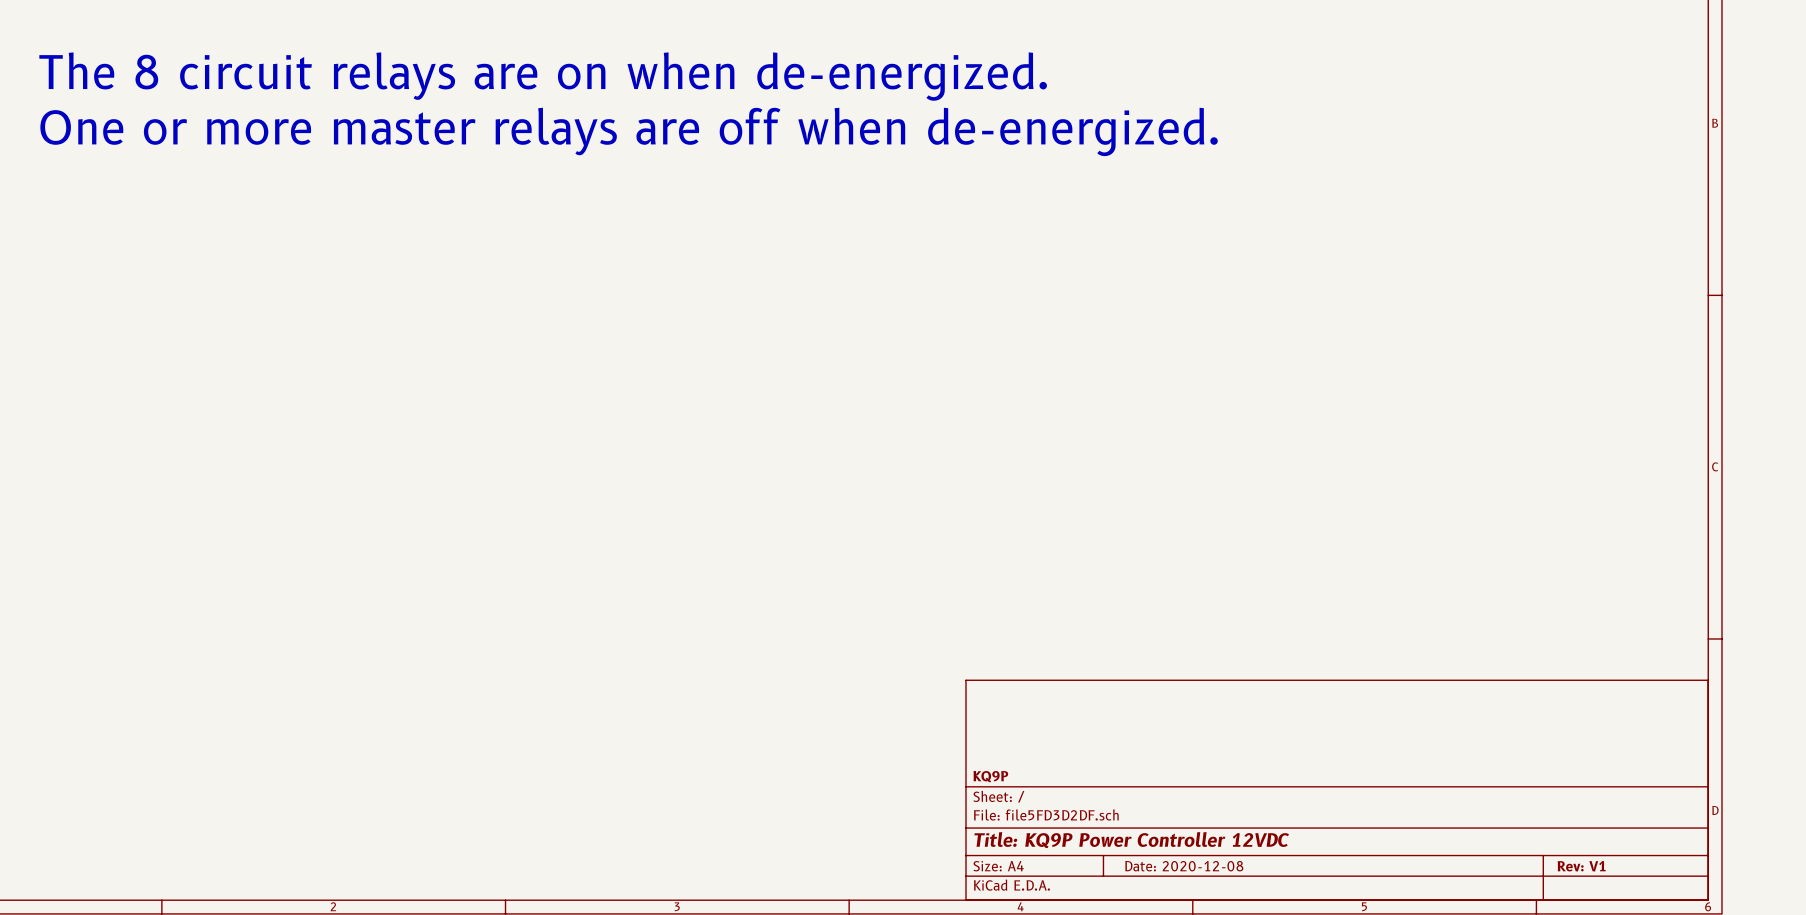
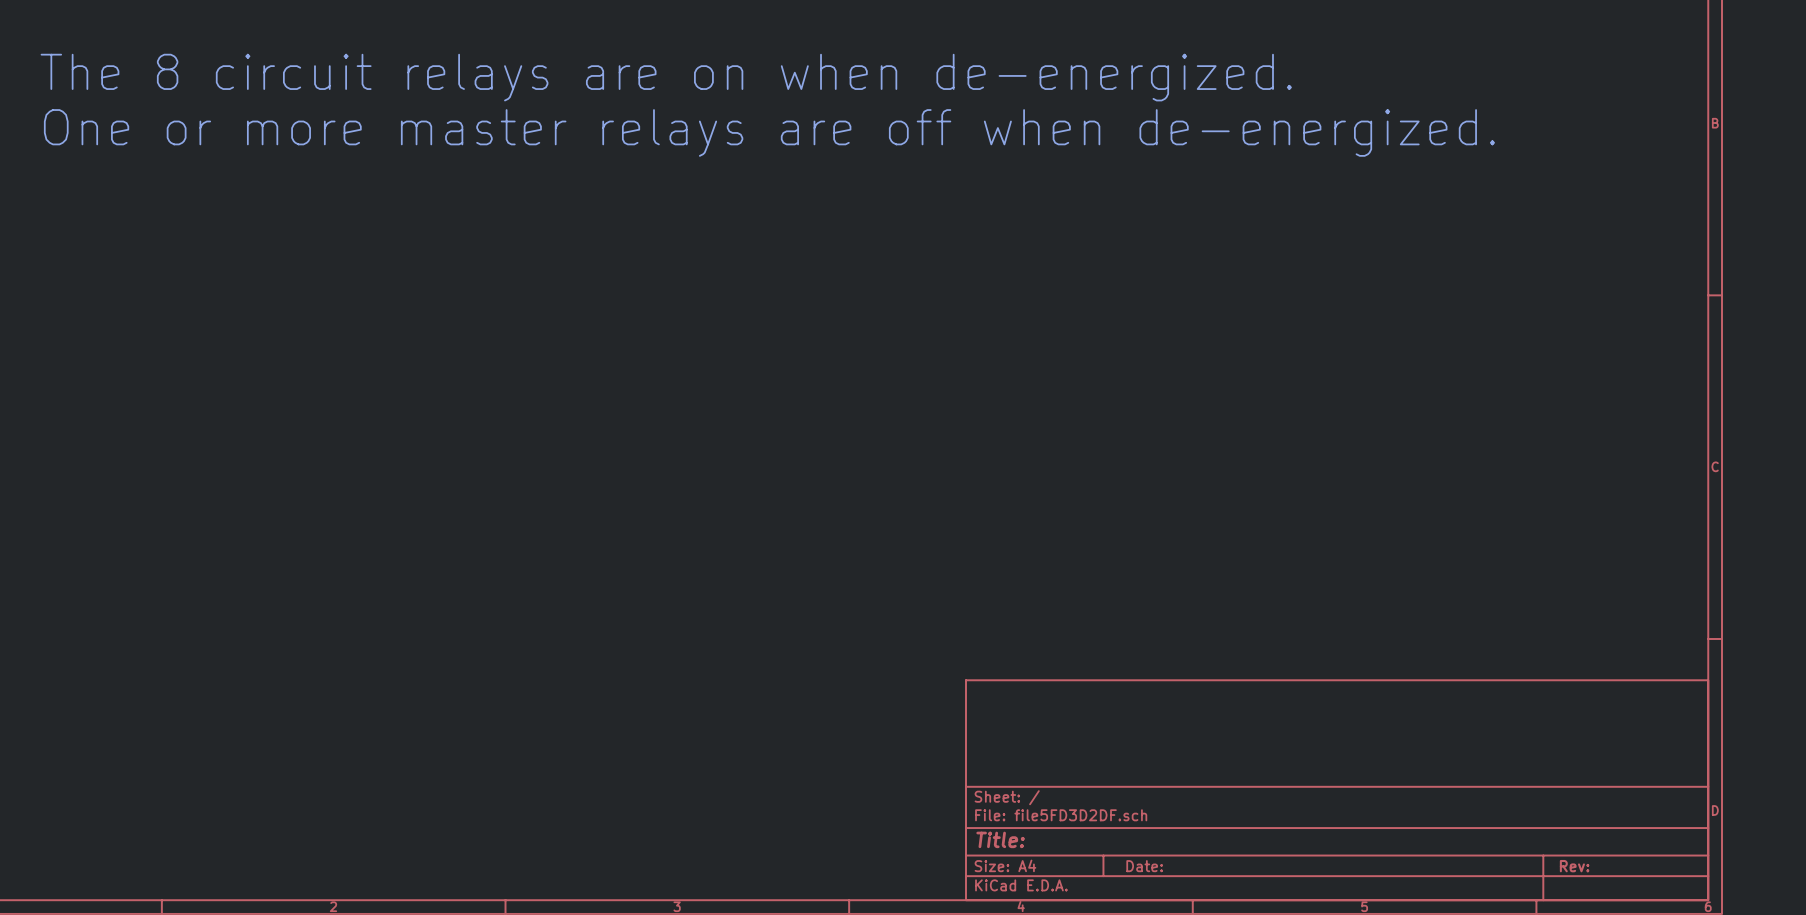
title block: KQ9P (990, 776) -> none
title block: Title: KQ9P Power Controller 12VDC (1131, 840) -> Title: (1000, 839)
title block: Date: 2020-12-08 (1184, 866) -> Date: (1144, 866)
title block: Rev: V1 (1581, 866) -> Rev: (1574, 866)

